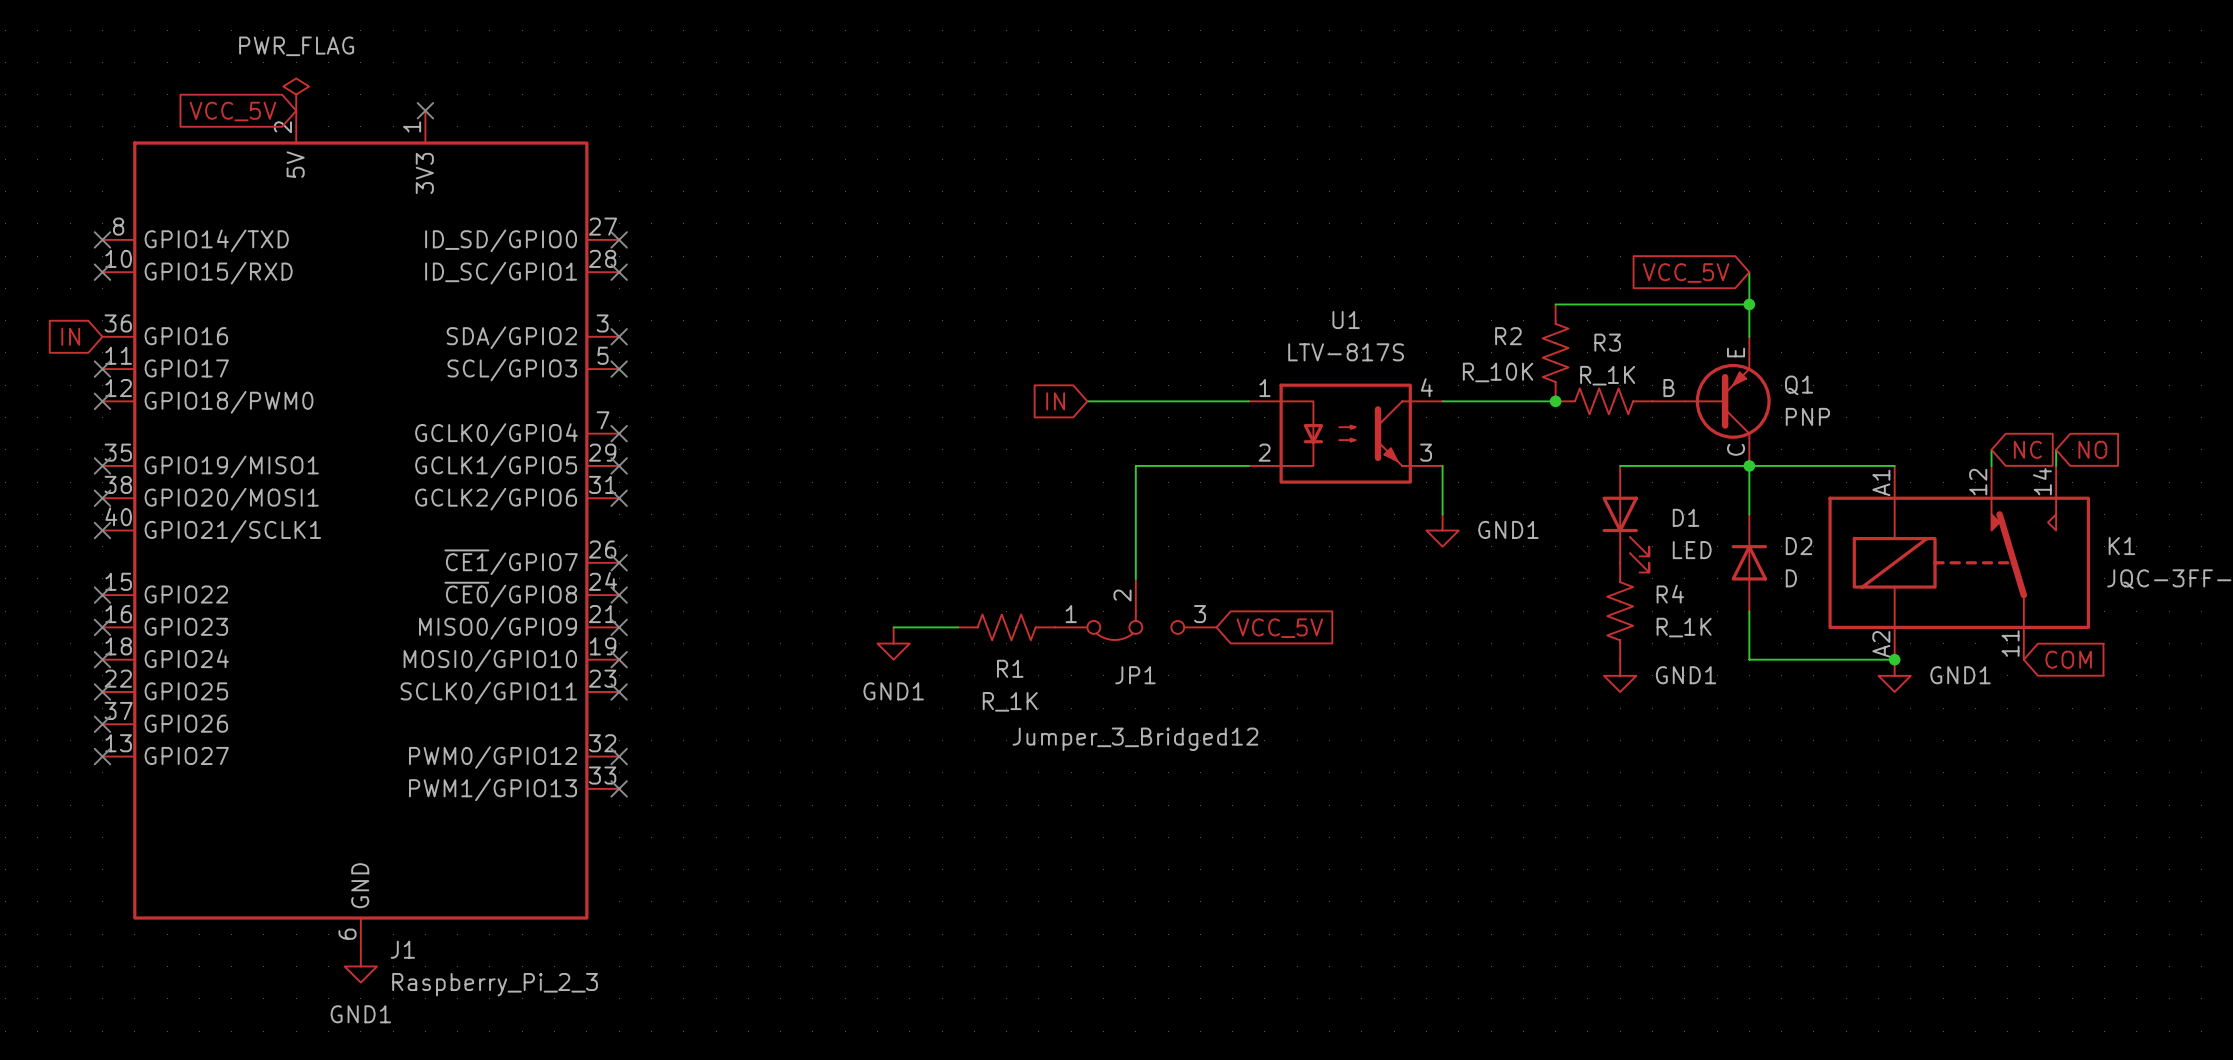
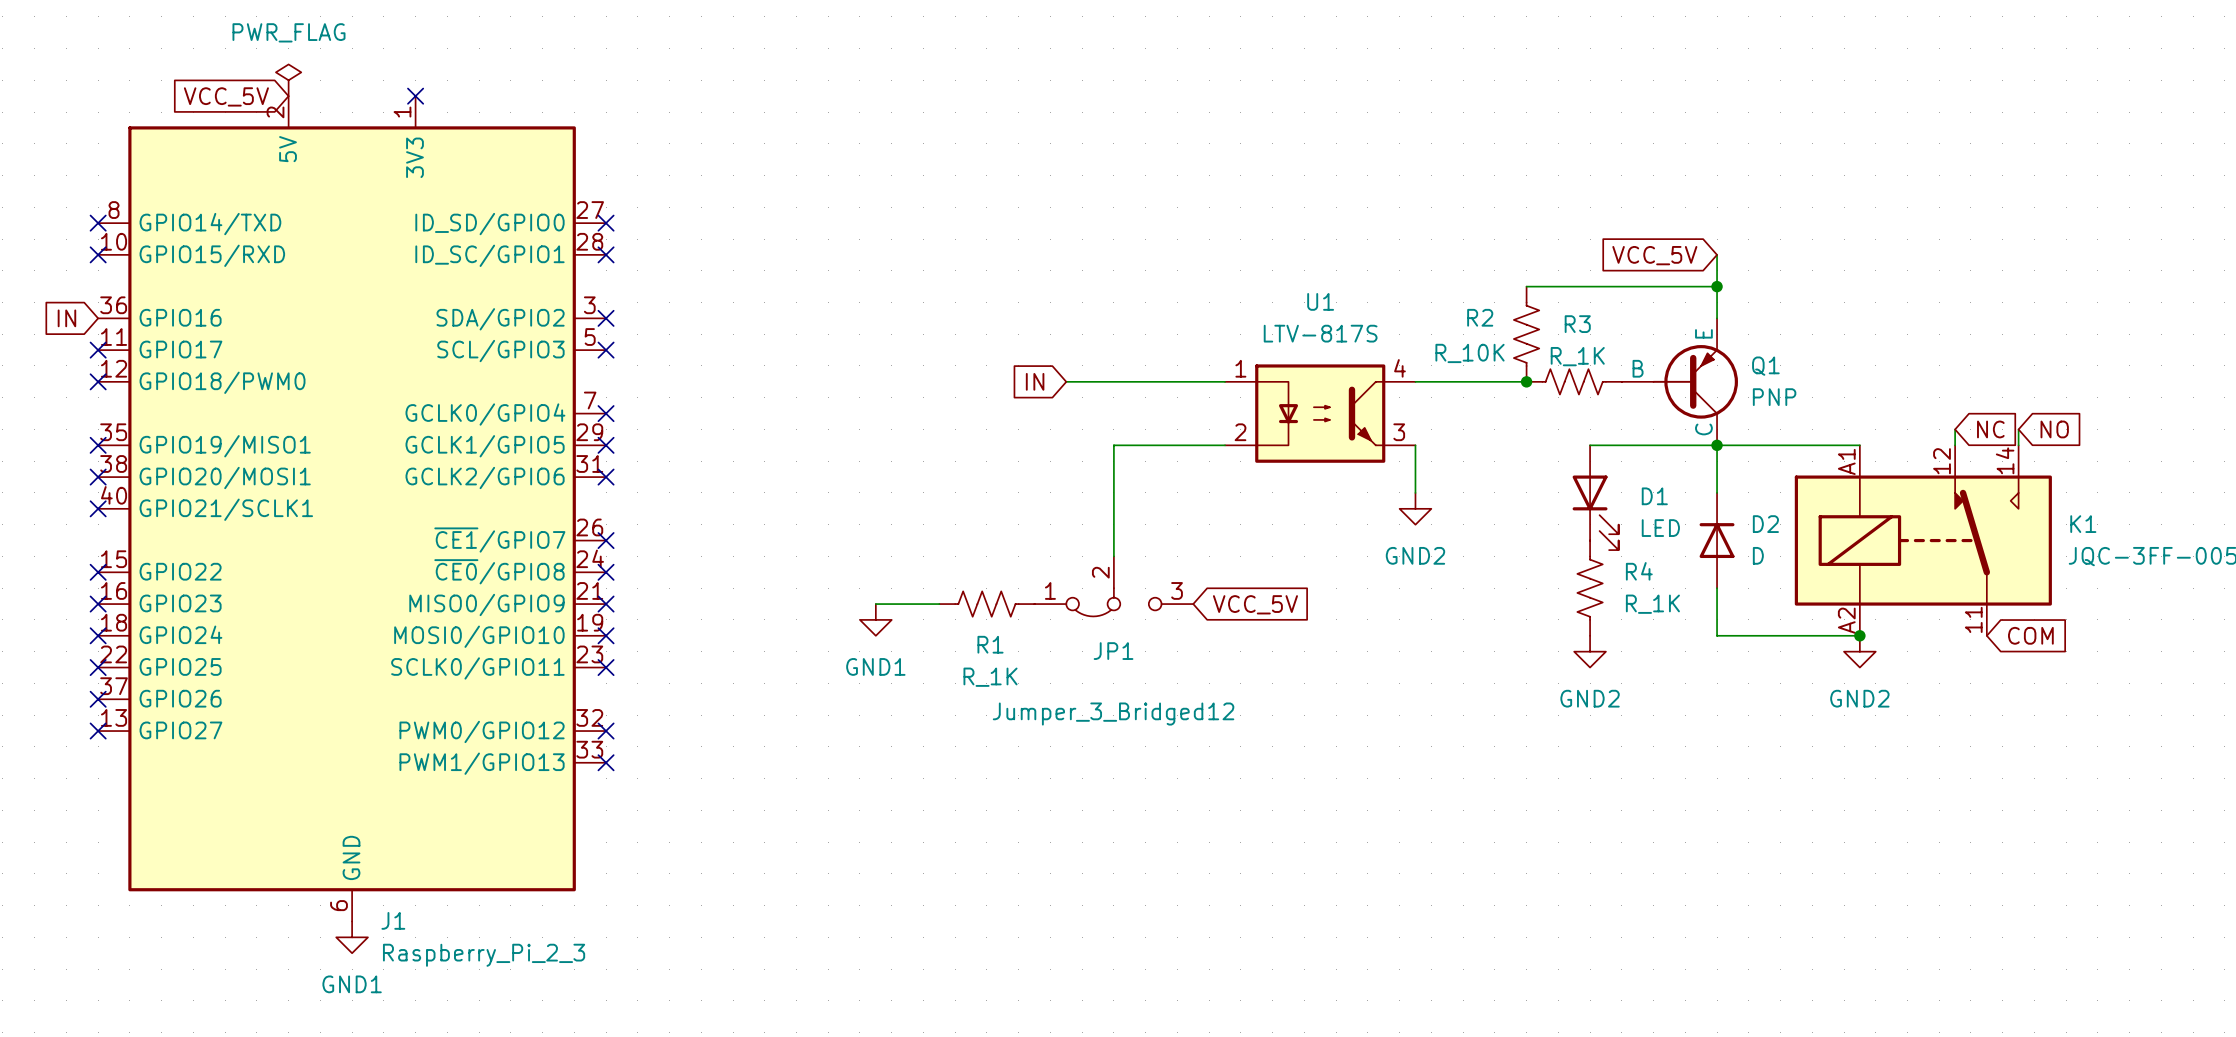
power symbol: GND1 (1442, 530) -> GND2 (1415, 508)
power symbol: GND1 (1620, 675) -> GND2 (1590, 651)
power symbol: GND1 (1894, 675) -> GND2 (1859, 651)

